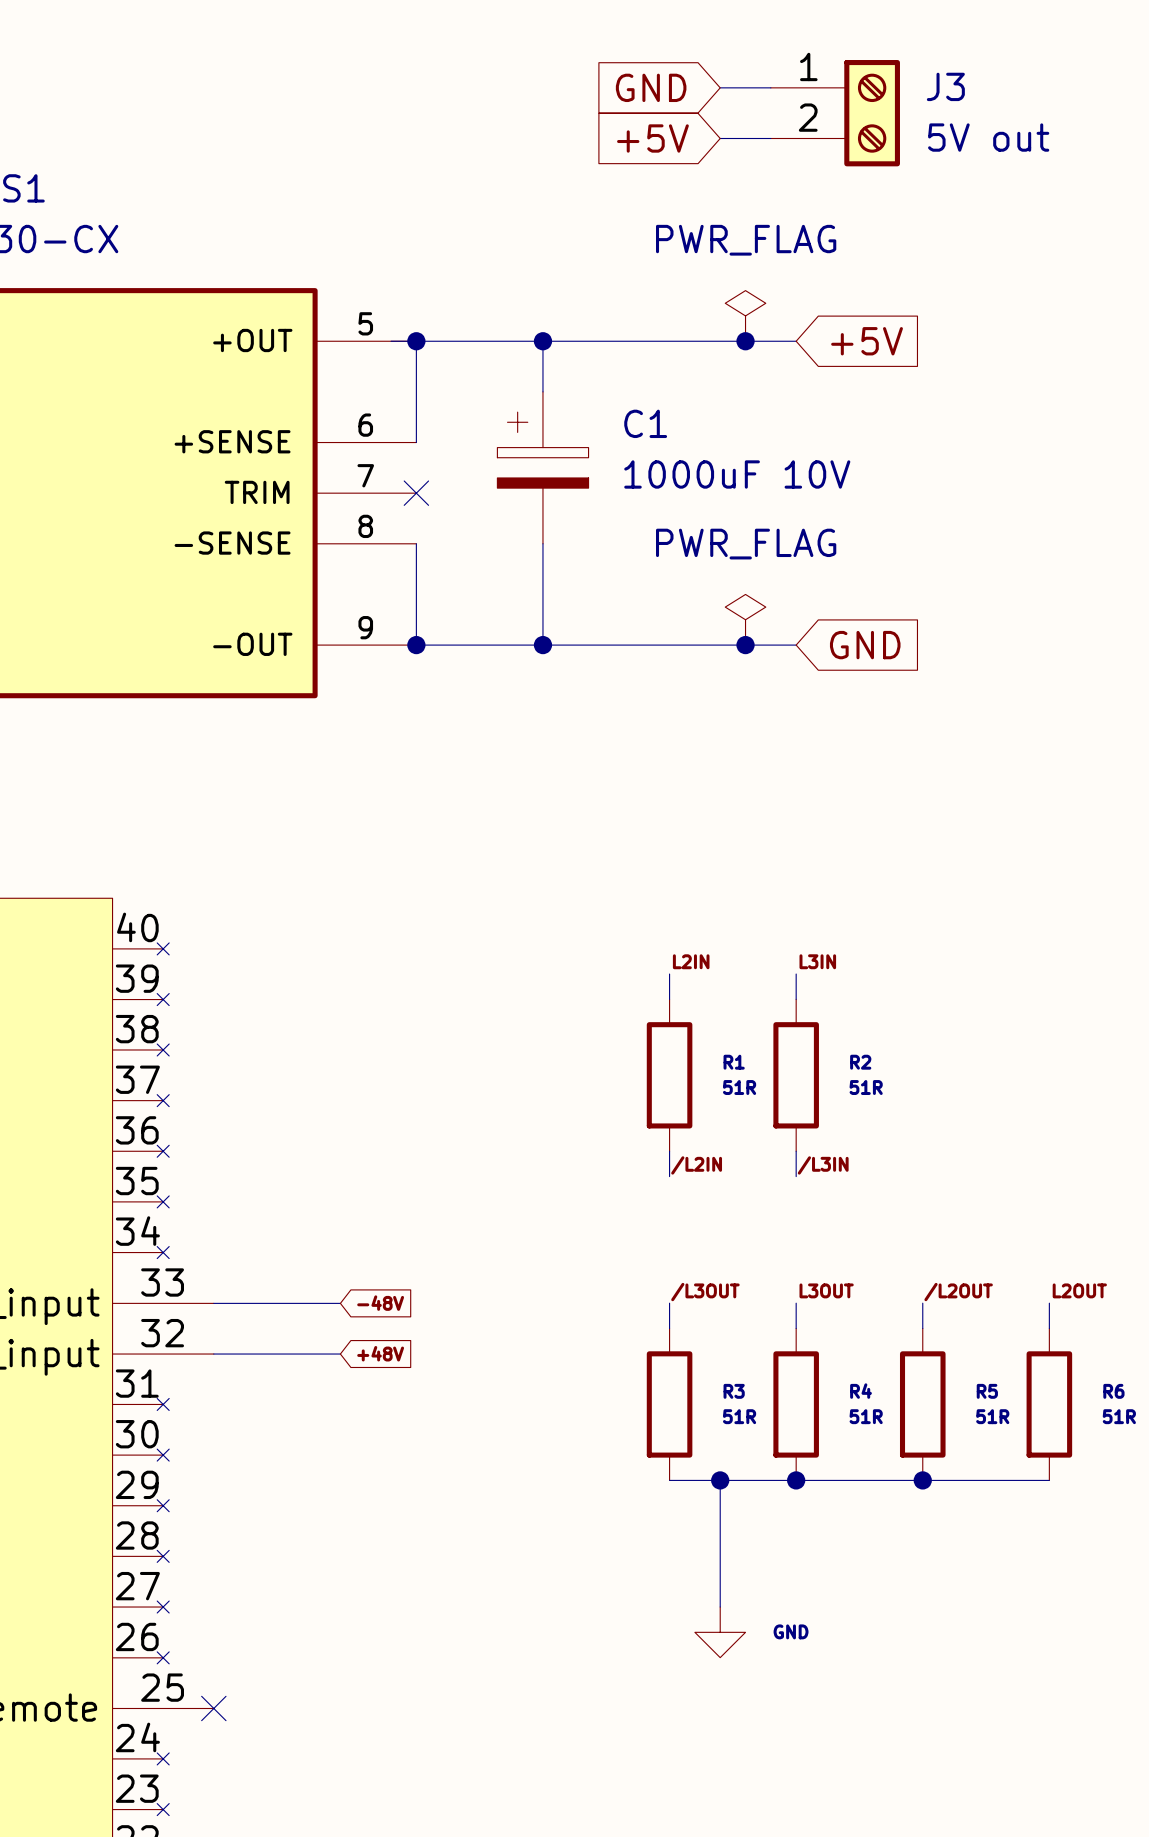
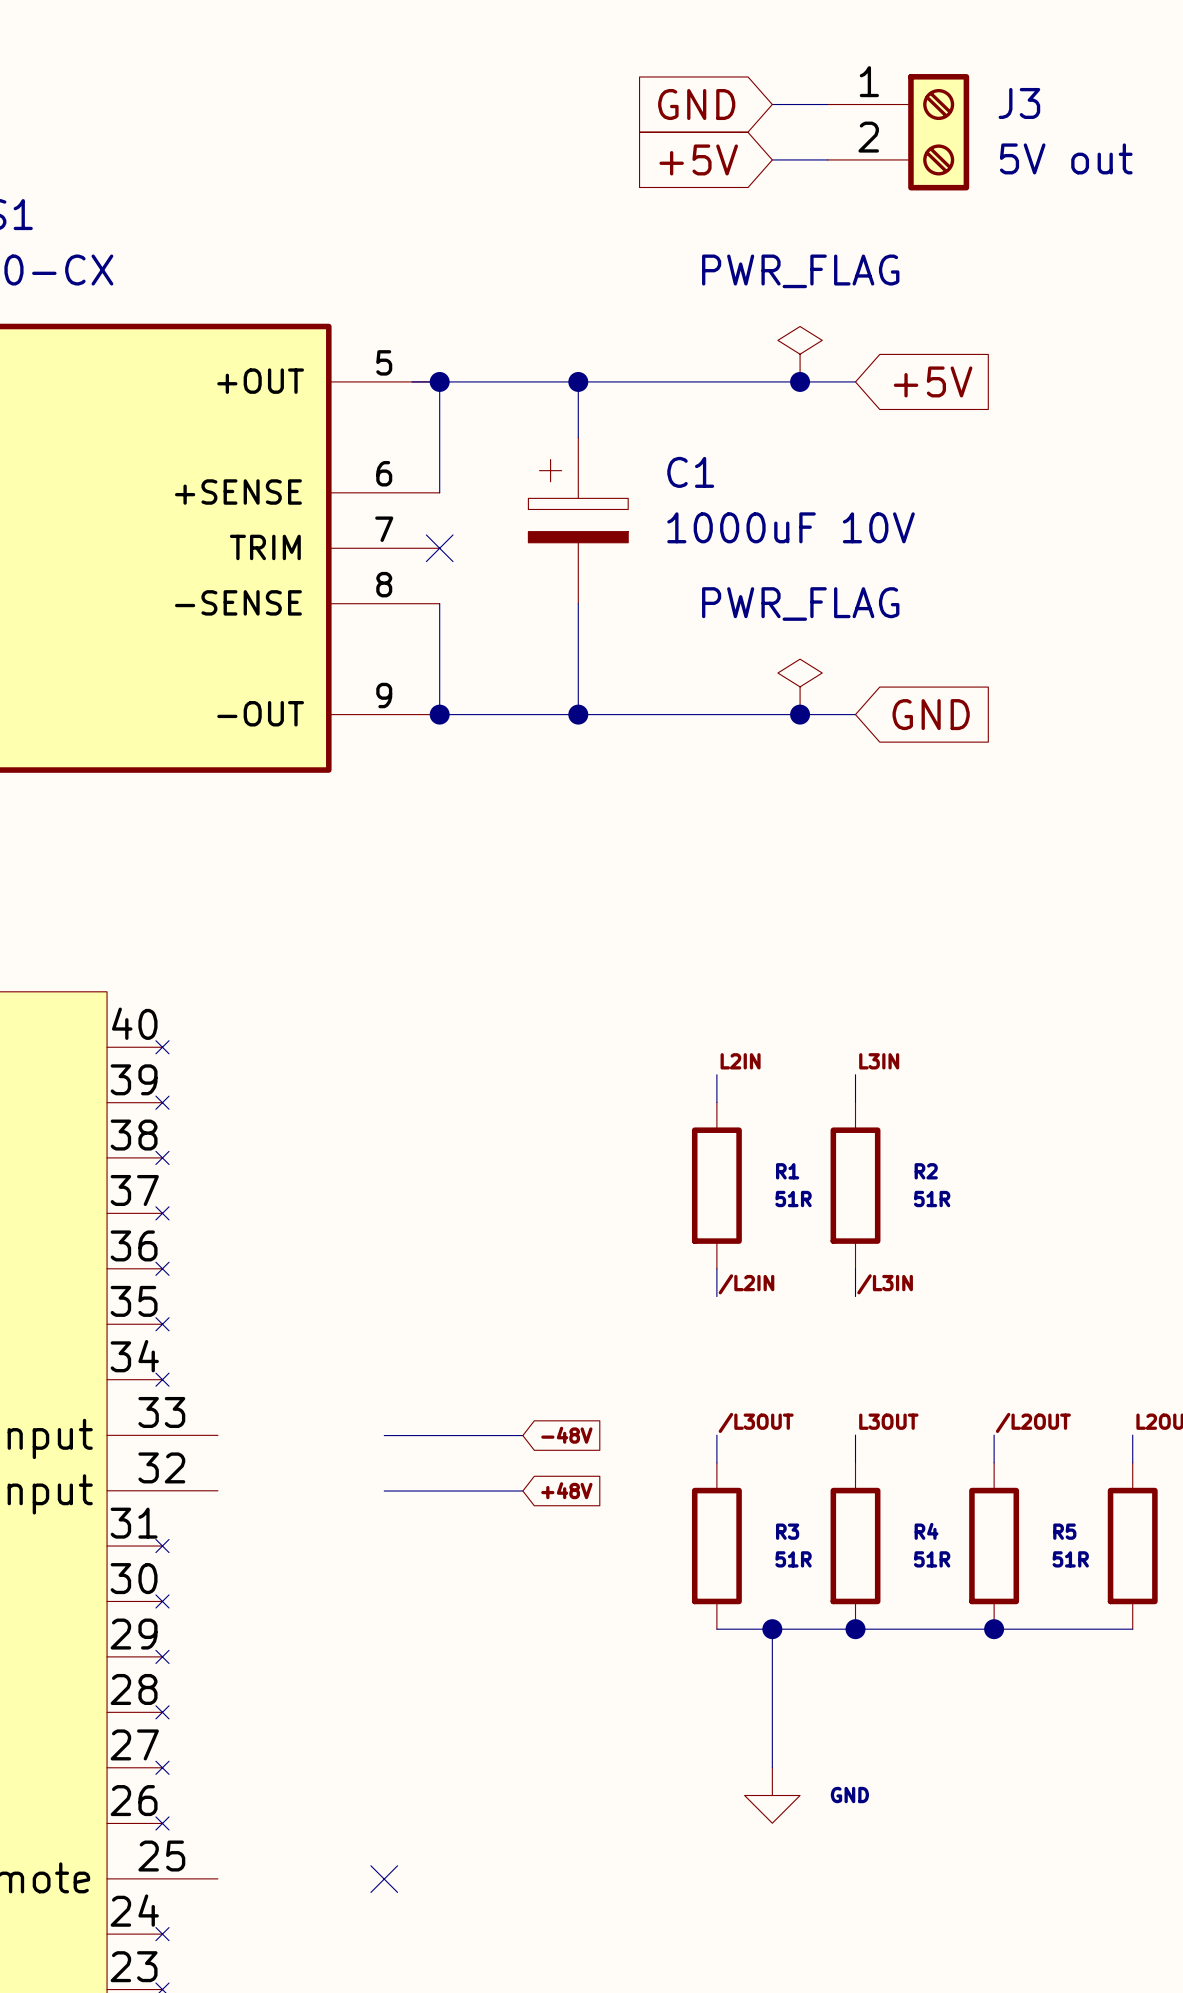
wire: (213, 1303) (340, 1303) -> (384, 1435) (522, 1435)
global label position: -48V (380, 1303) -> -48V (566, 1435)
global label position: +48V (380, 1353) -> +48V (566, 1490)
wire: (213, 1354) (340, 1354) -> (384, 1491) (522, 1491)
no-connect mark: (213, 1708) -> none
no-connect mark: none -> (384, 1879)

